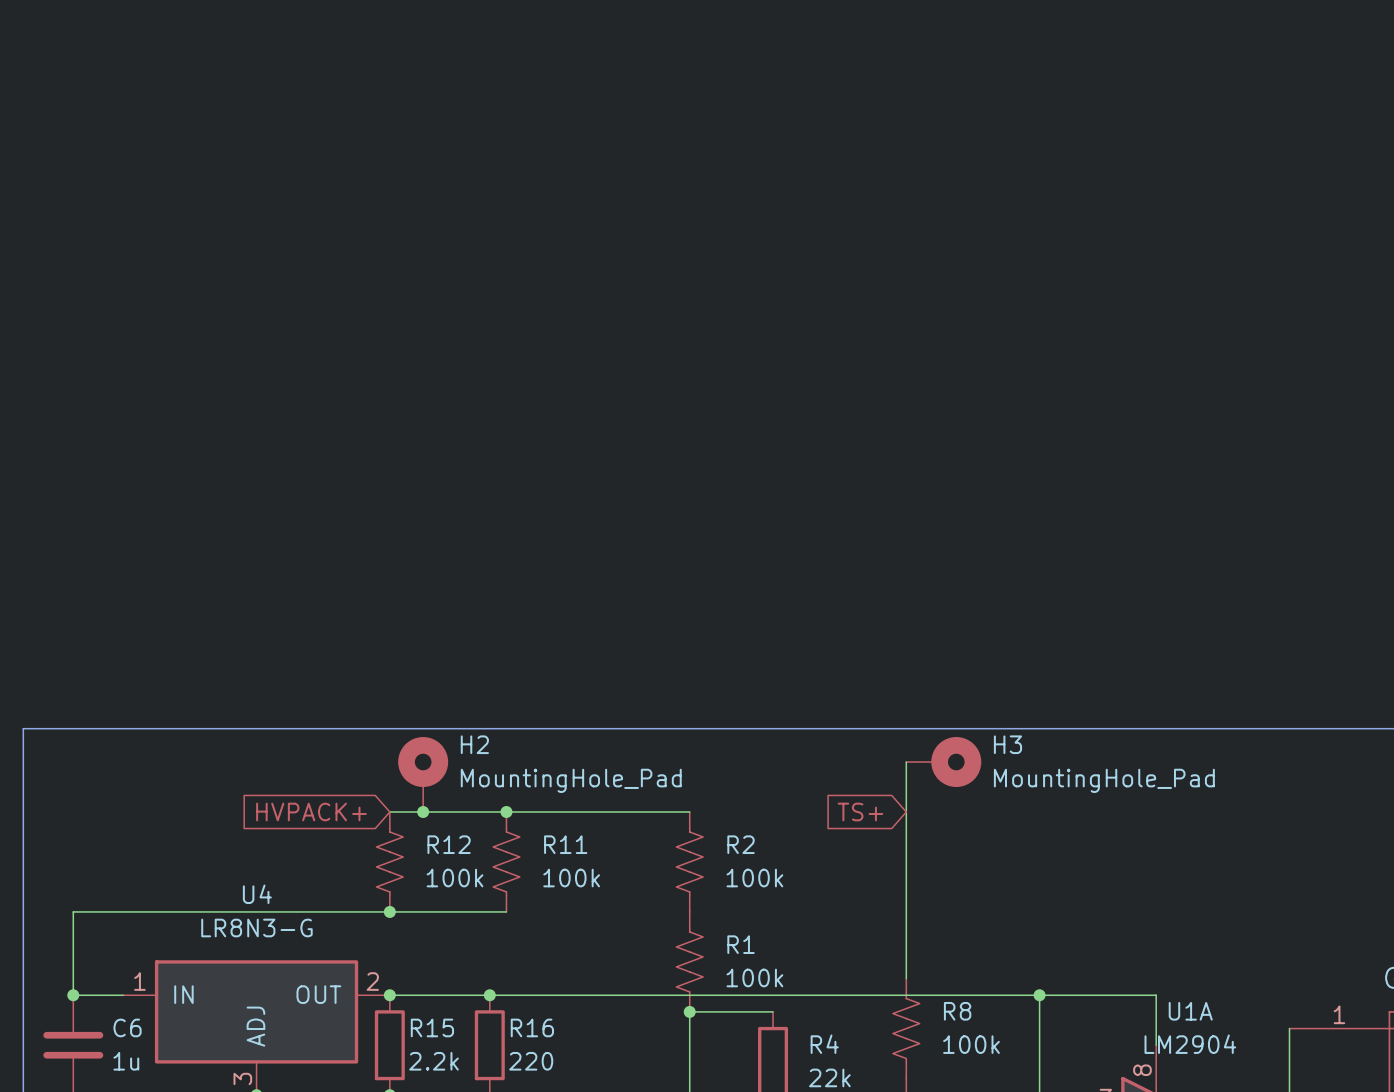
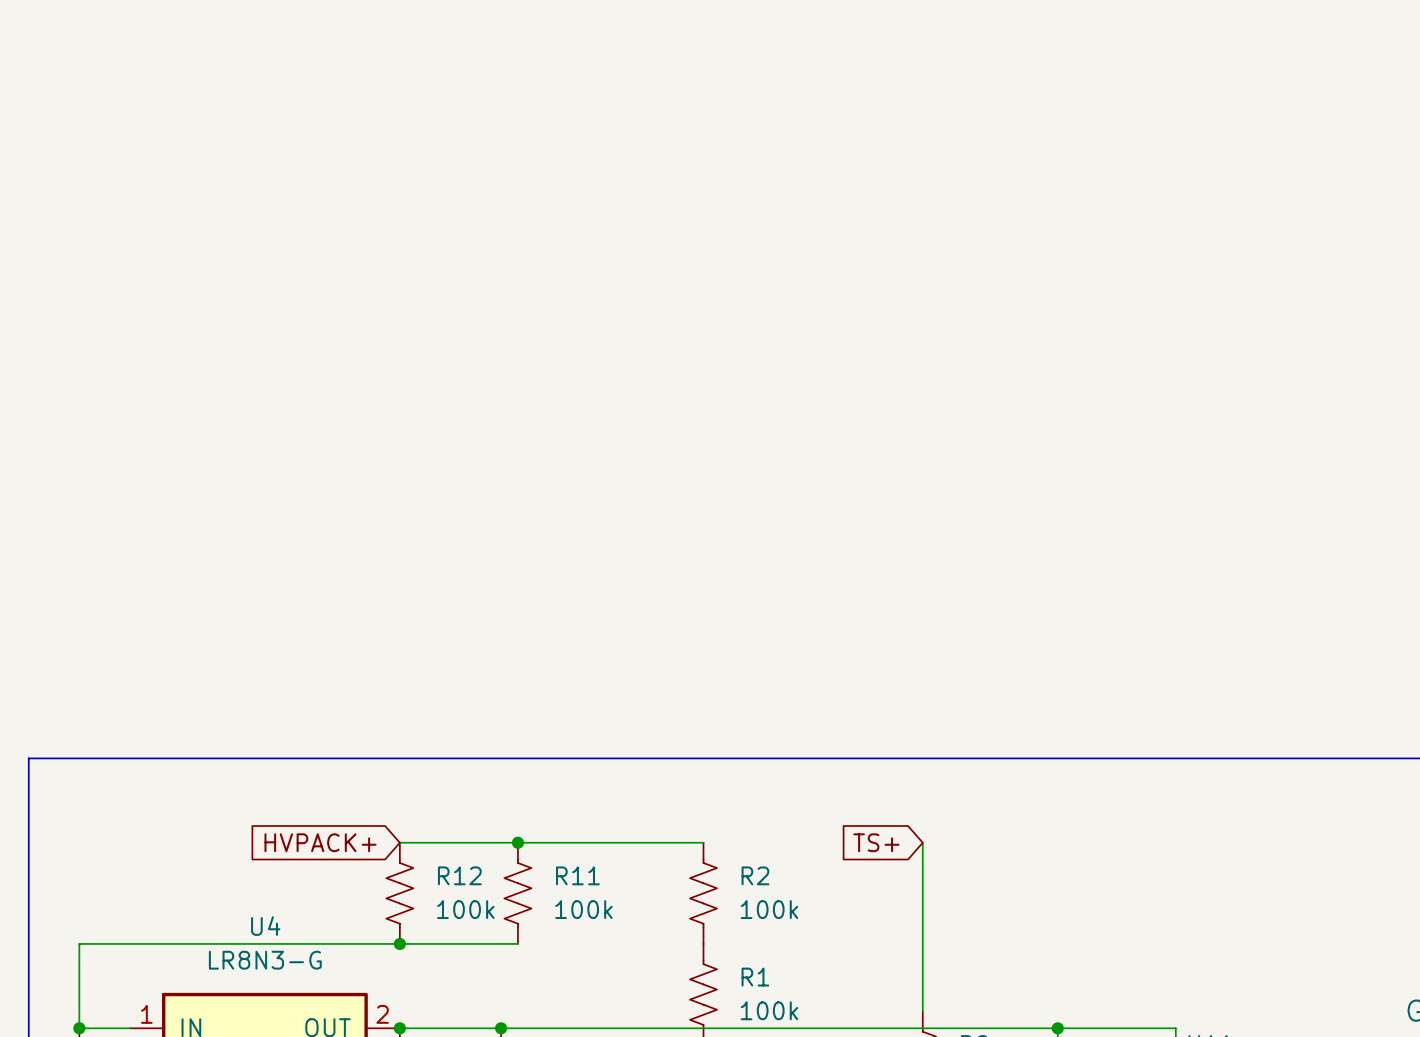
wire: (906, 762) (906, 811) -> none
H3: MountingHole_Pad (943, 762) -> none
H2: MountingHole_Pad (423, 774) -> none
junction: (423, 811) -> none

